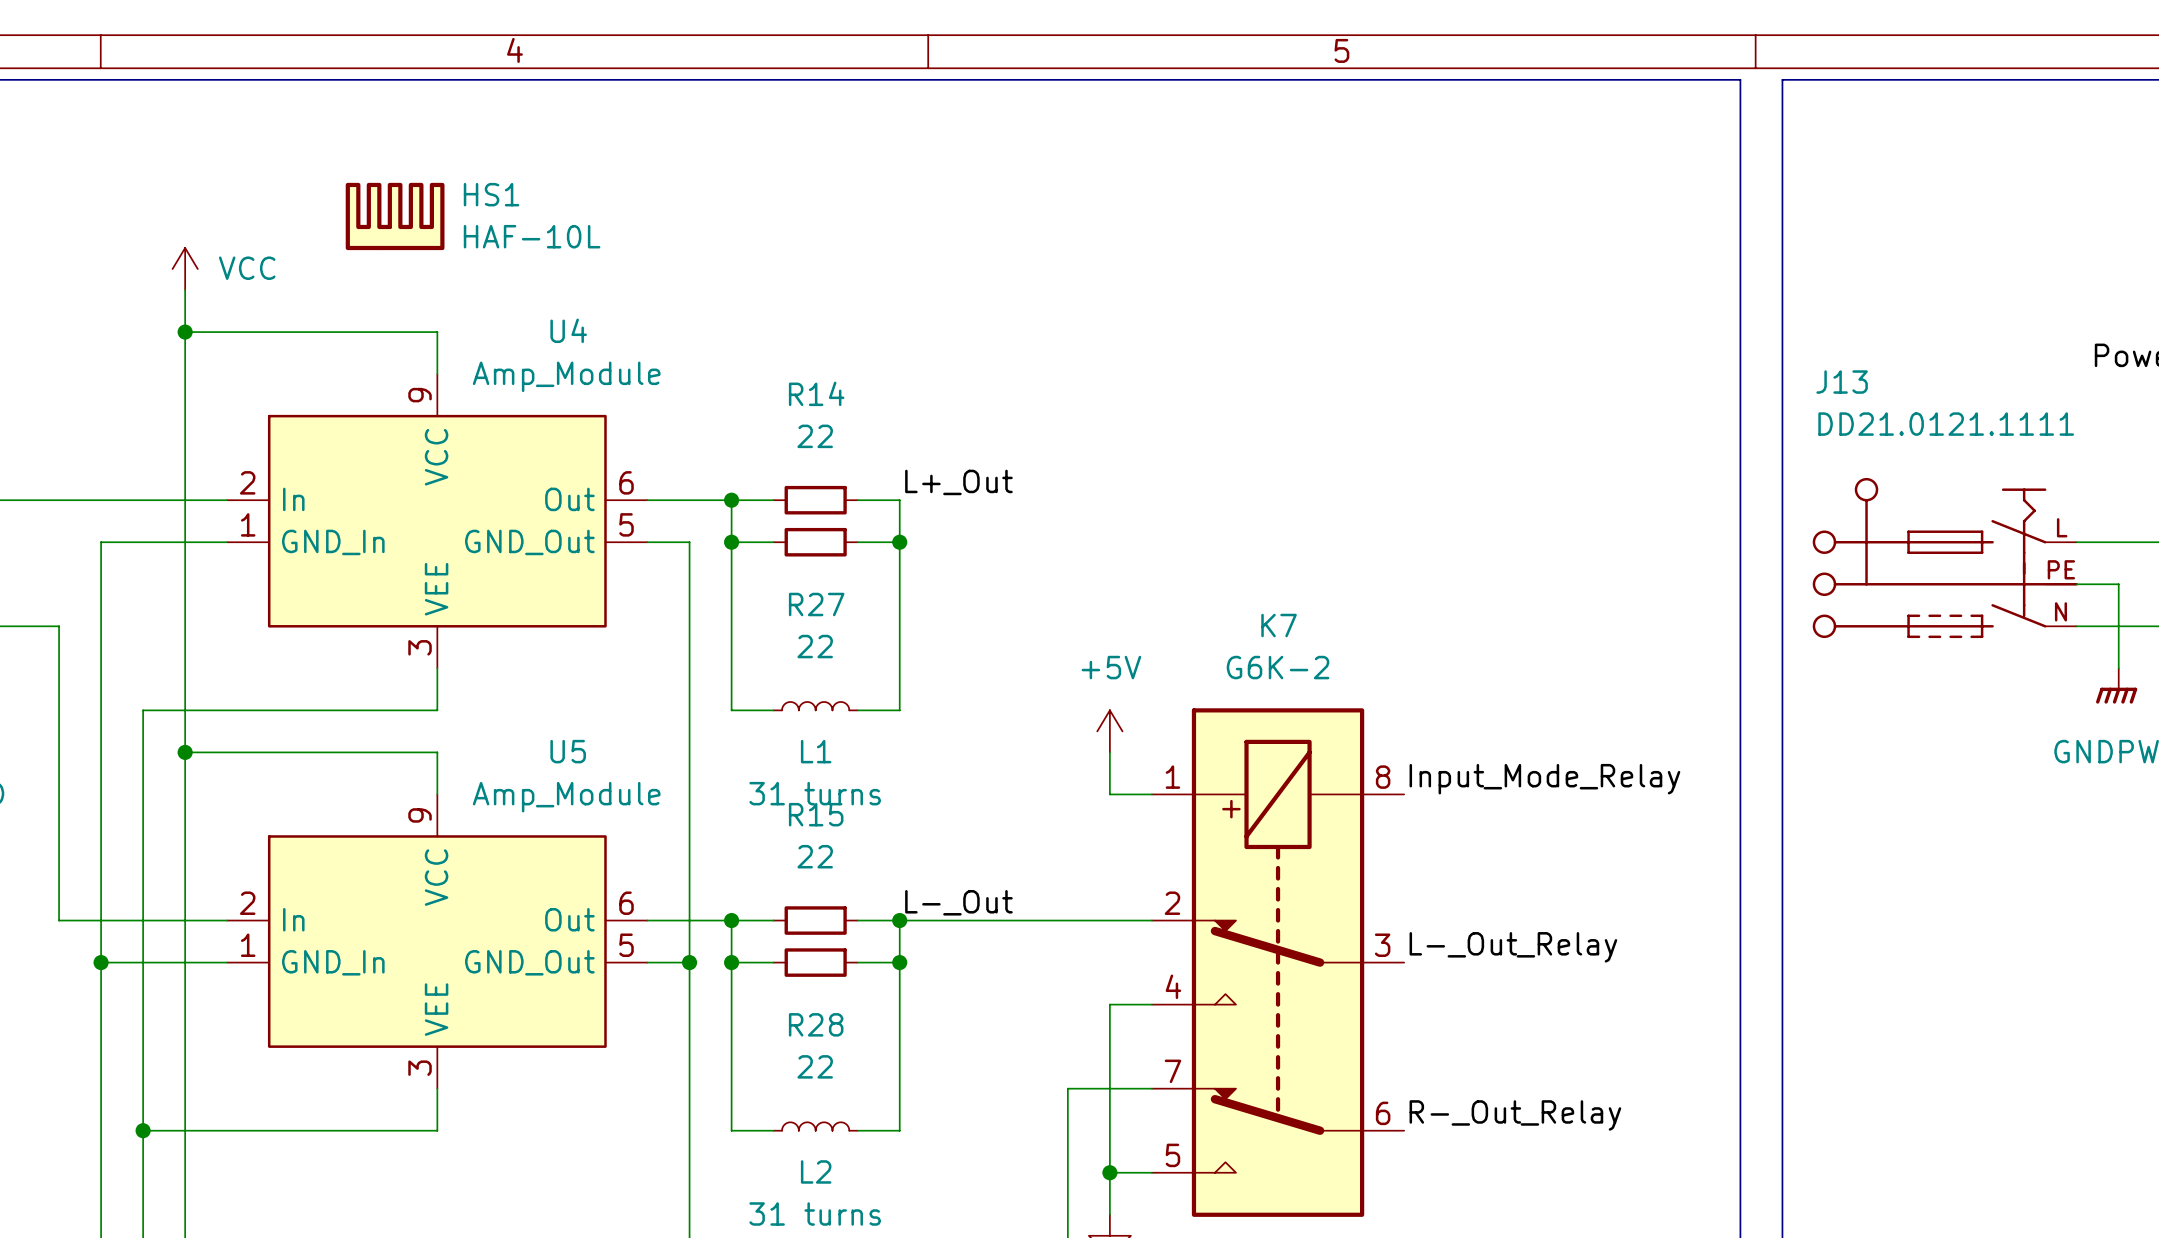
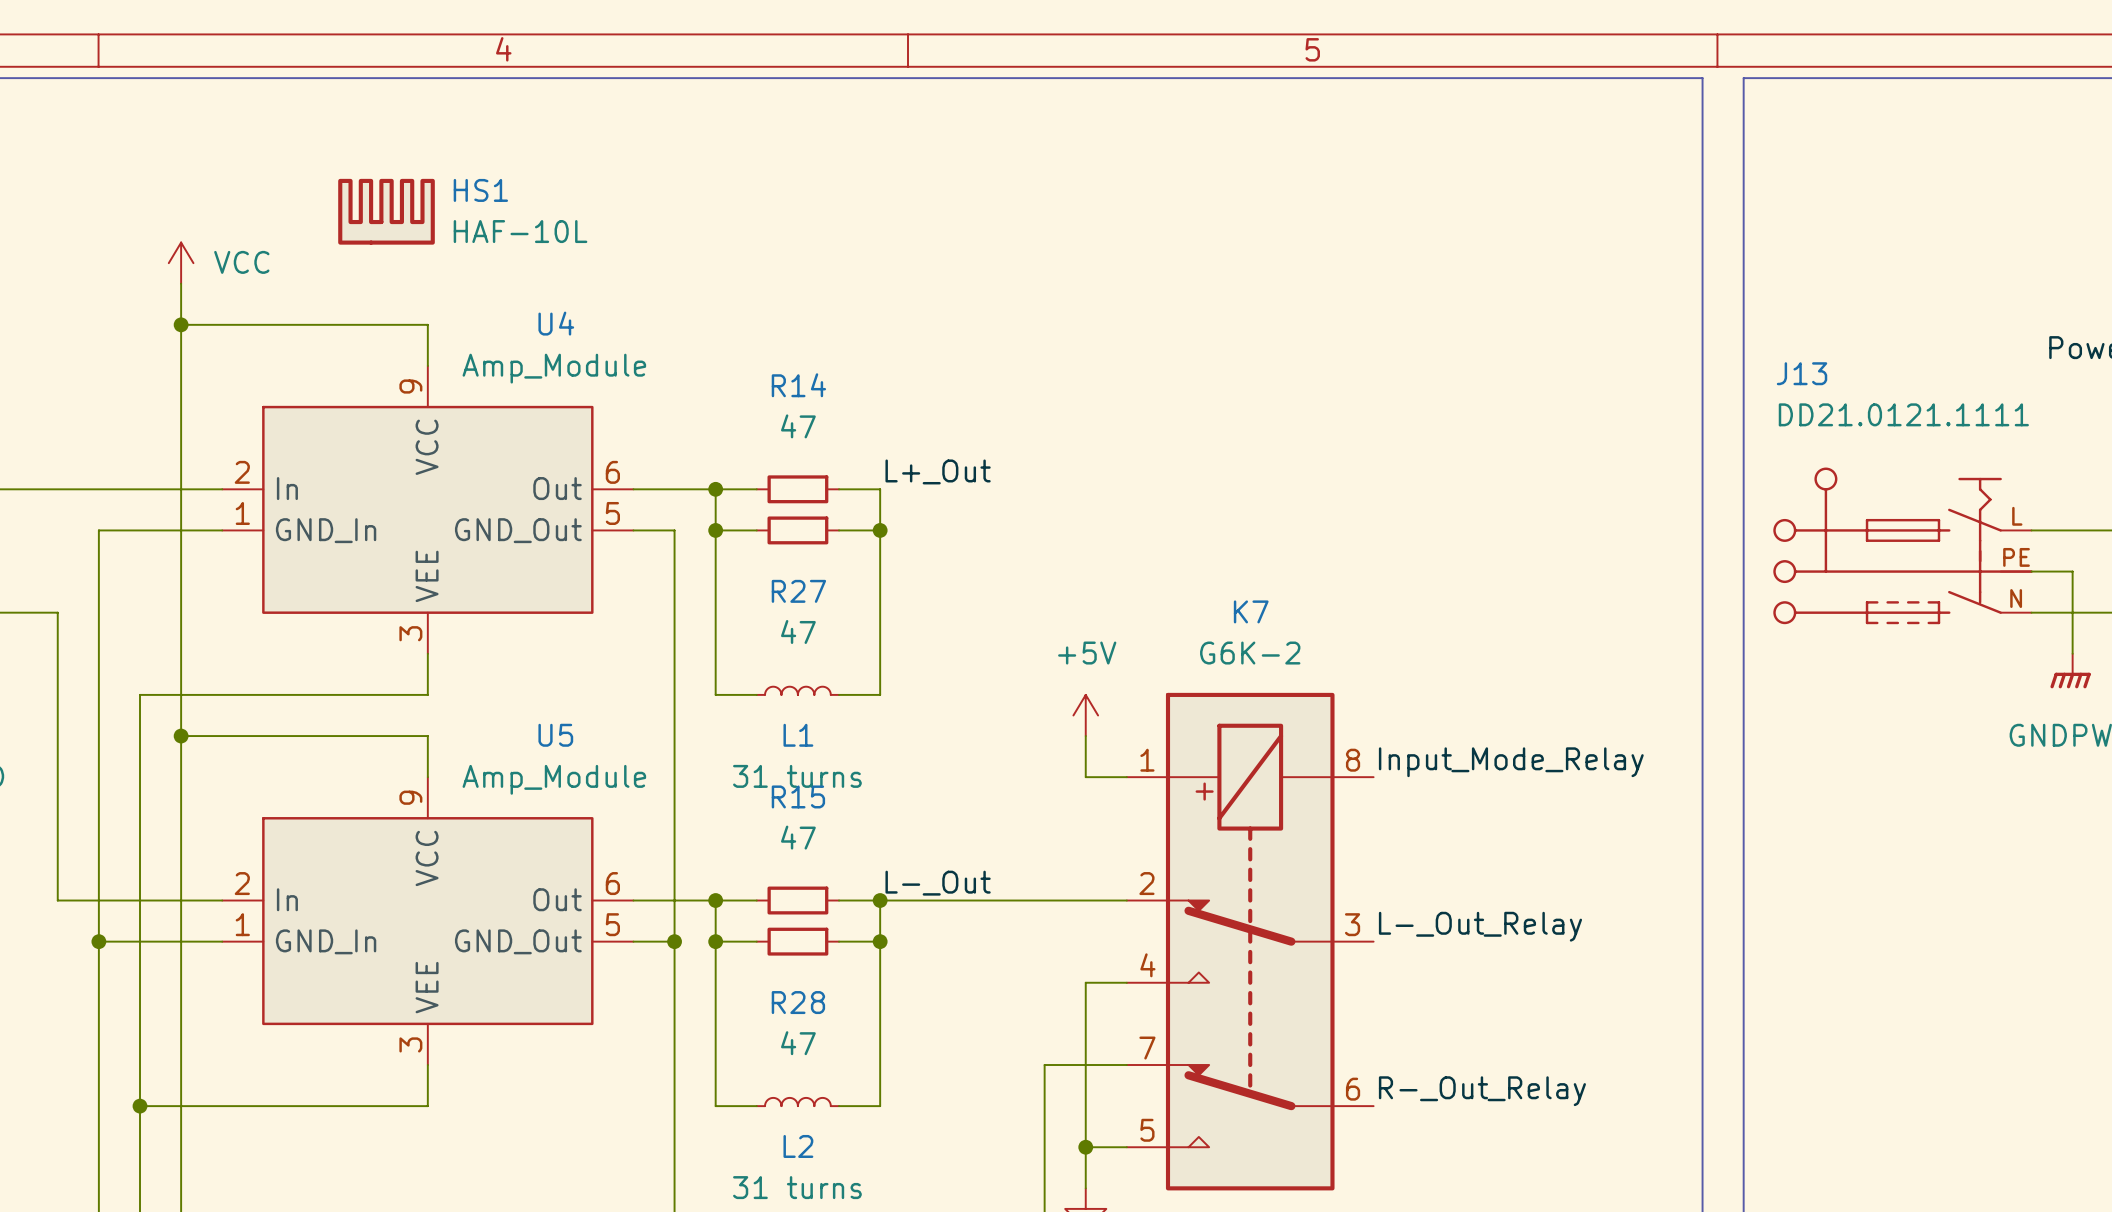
R14 value: 22 (815, 436) -> 47 (798, 426)
R27 value: 22 (815, 646) -> 47 (798, 631)
R15 value: 22 (815, 856) -> 47 (798, 837)
R28 value: 22 (815, 1066) -> 47 (798, 1043)

